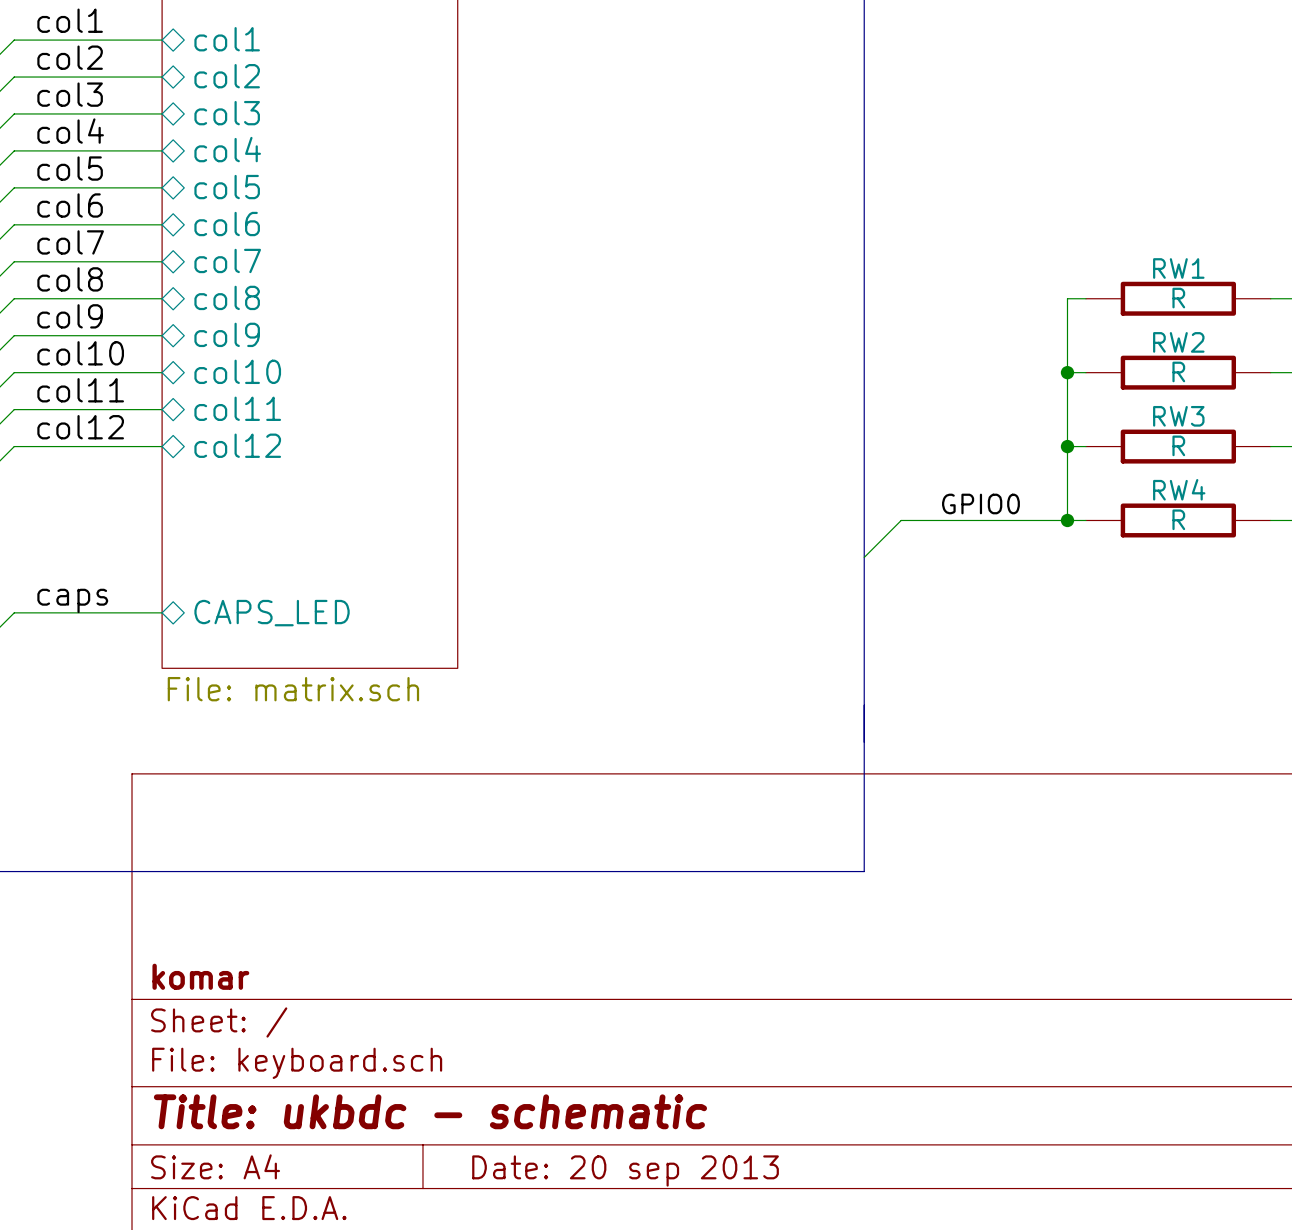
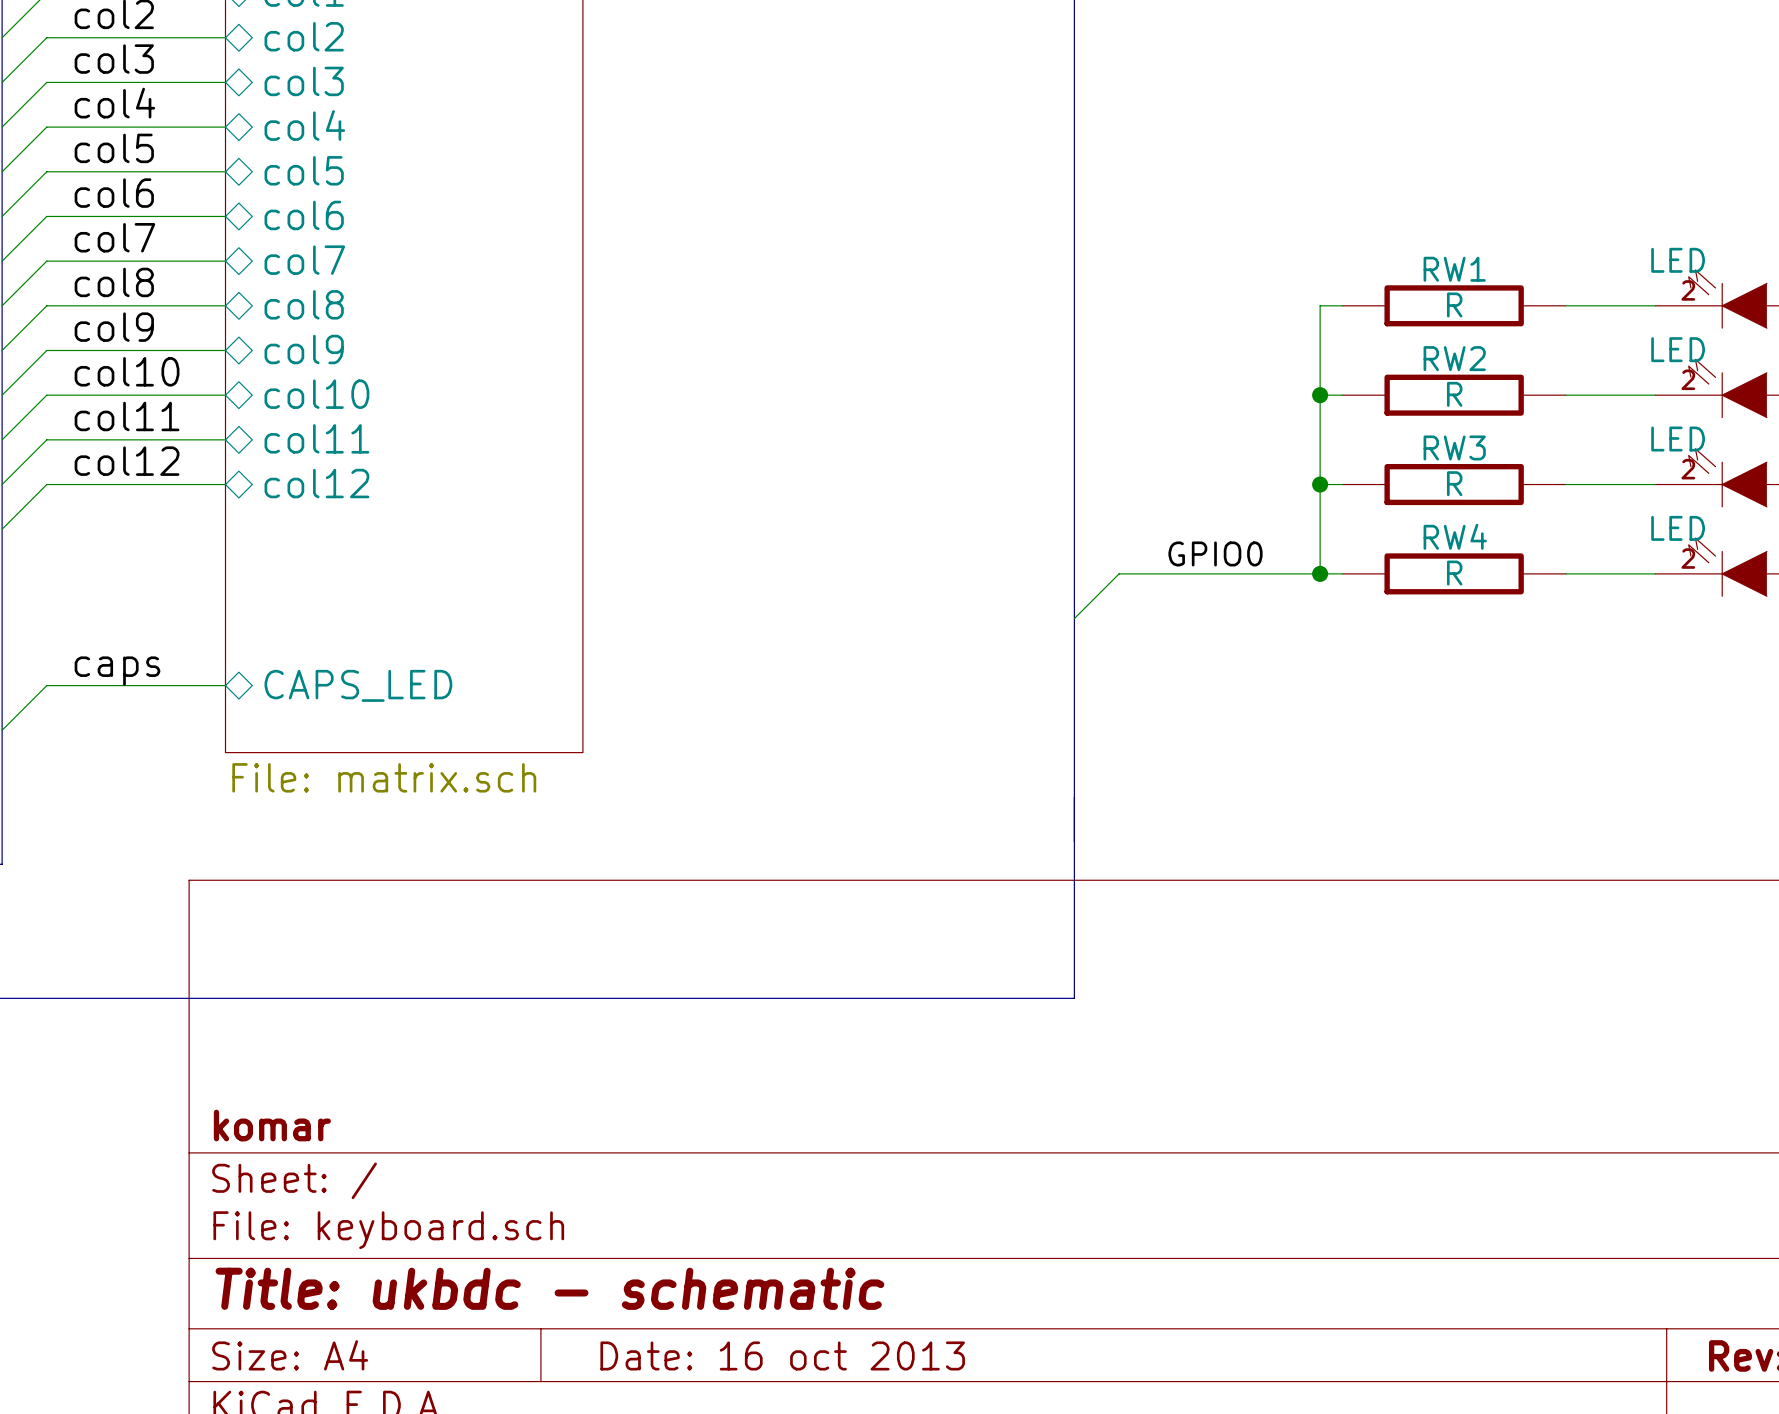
title block: Date: 20 sep 2013 (625, 1170) -> Date: 16 oct 2013 (782, 1355)

